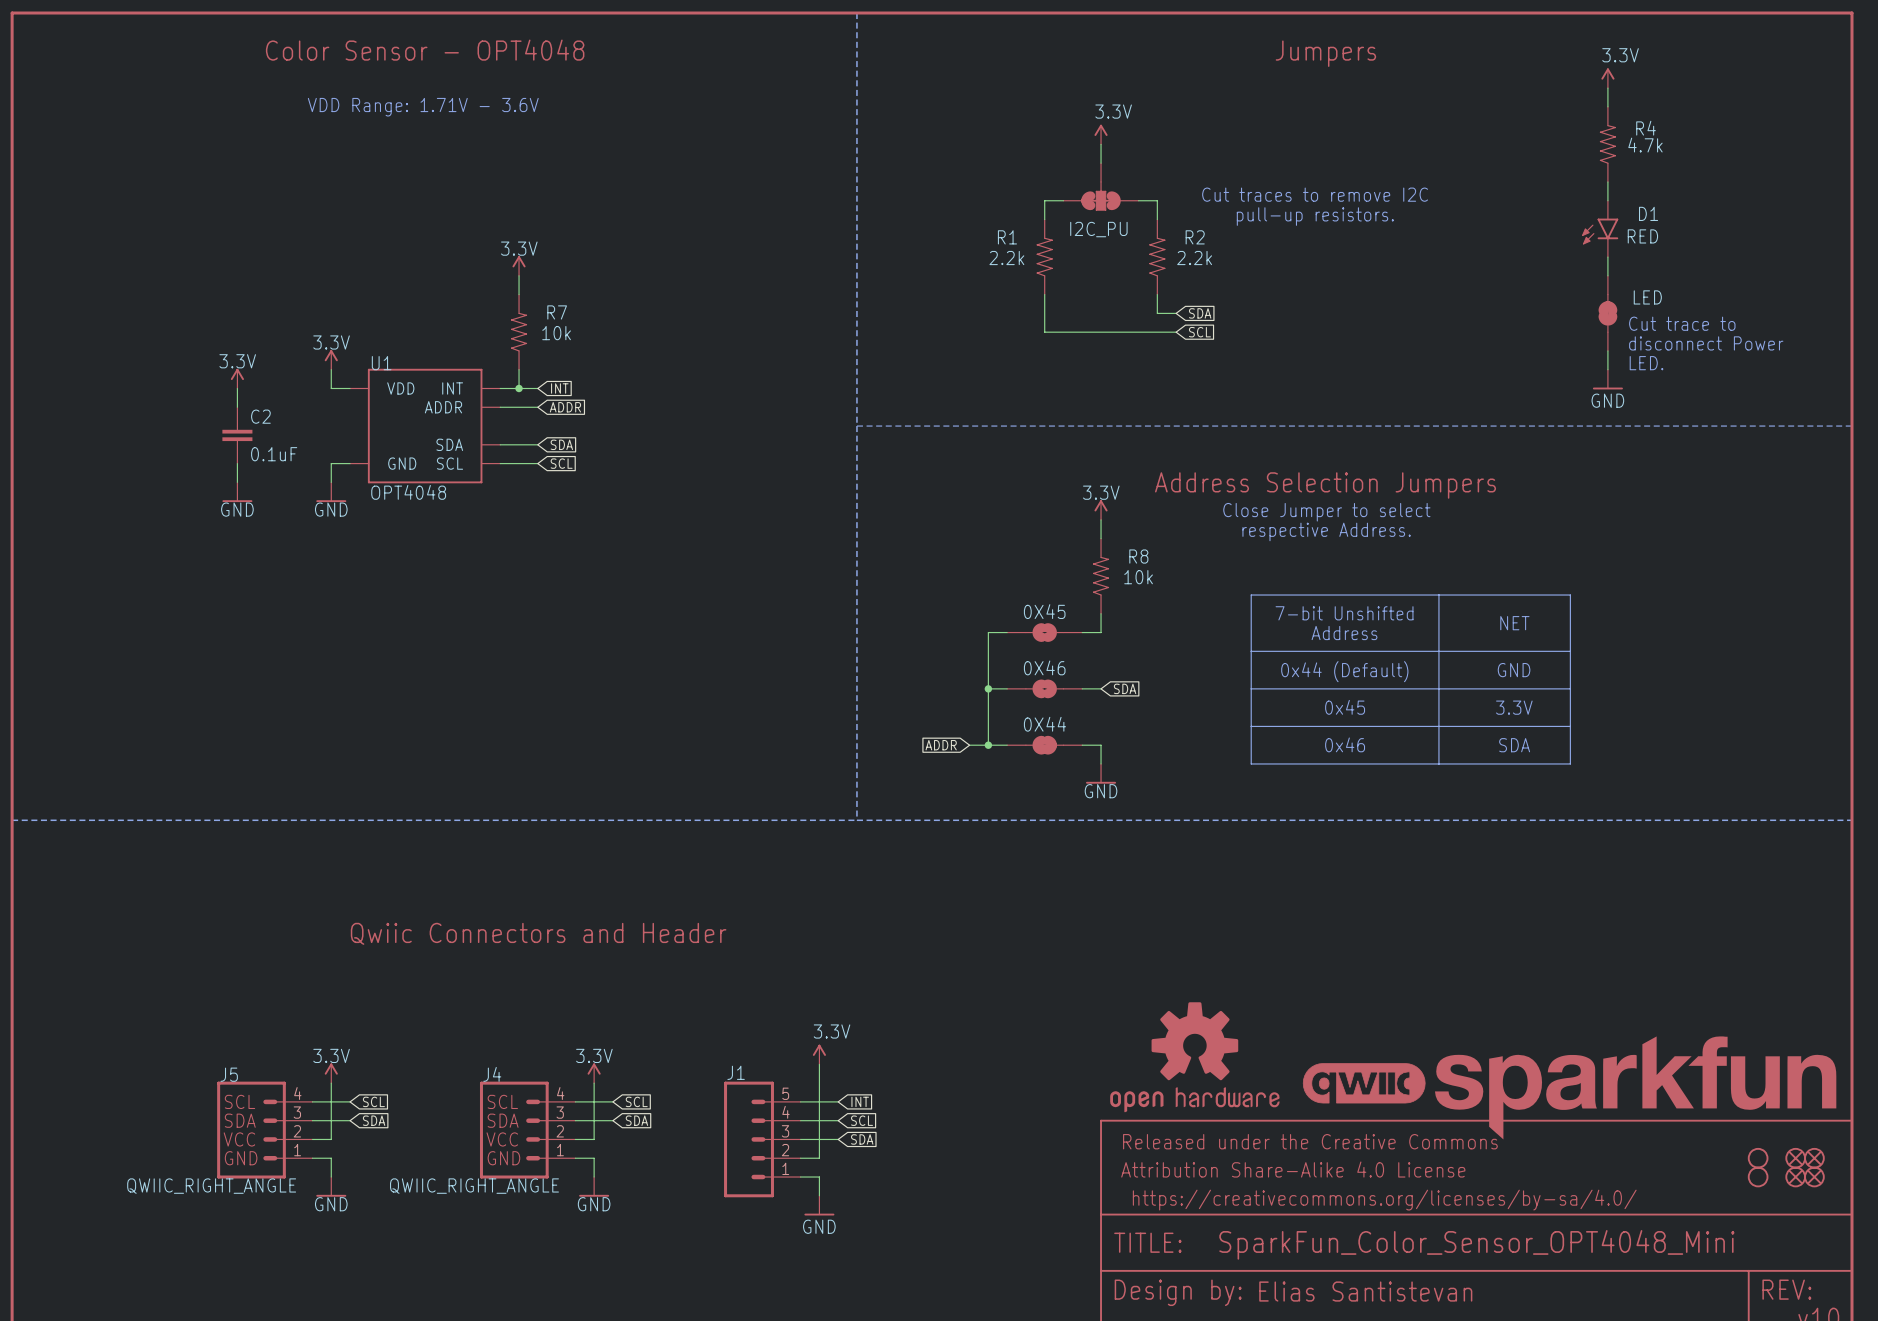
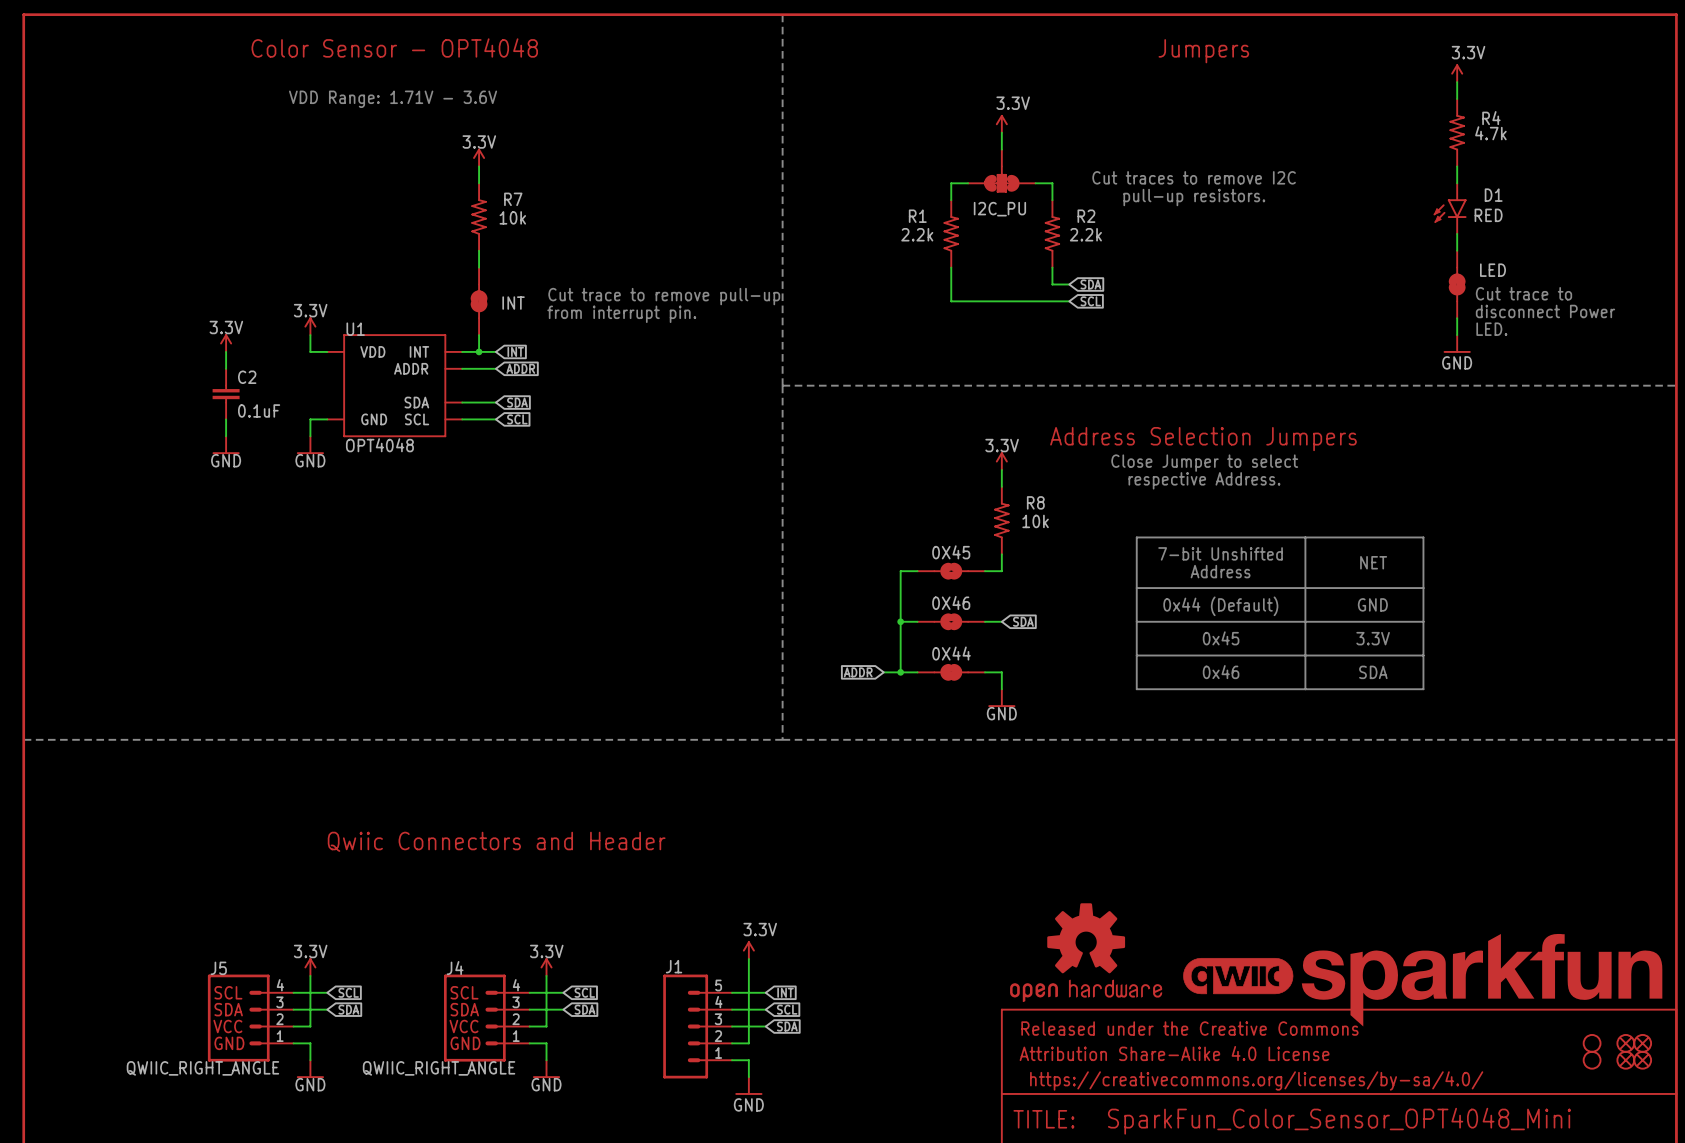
wire: none -> (479, 166) (479, 183)
power symbol position: 3.3V (519, 265) -> 3.3V (479, 157)
text: none -> Cut trace to remove pull-up (664, 296)
R7 position: (519, 332) -> (479, 217)
INT: none -> (479, 301)
text: none -> from interrupt pin. (621, 314)

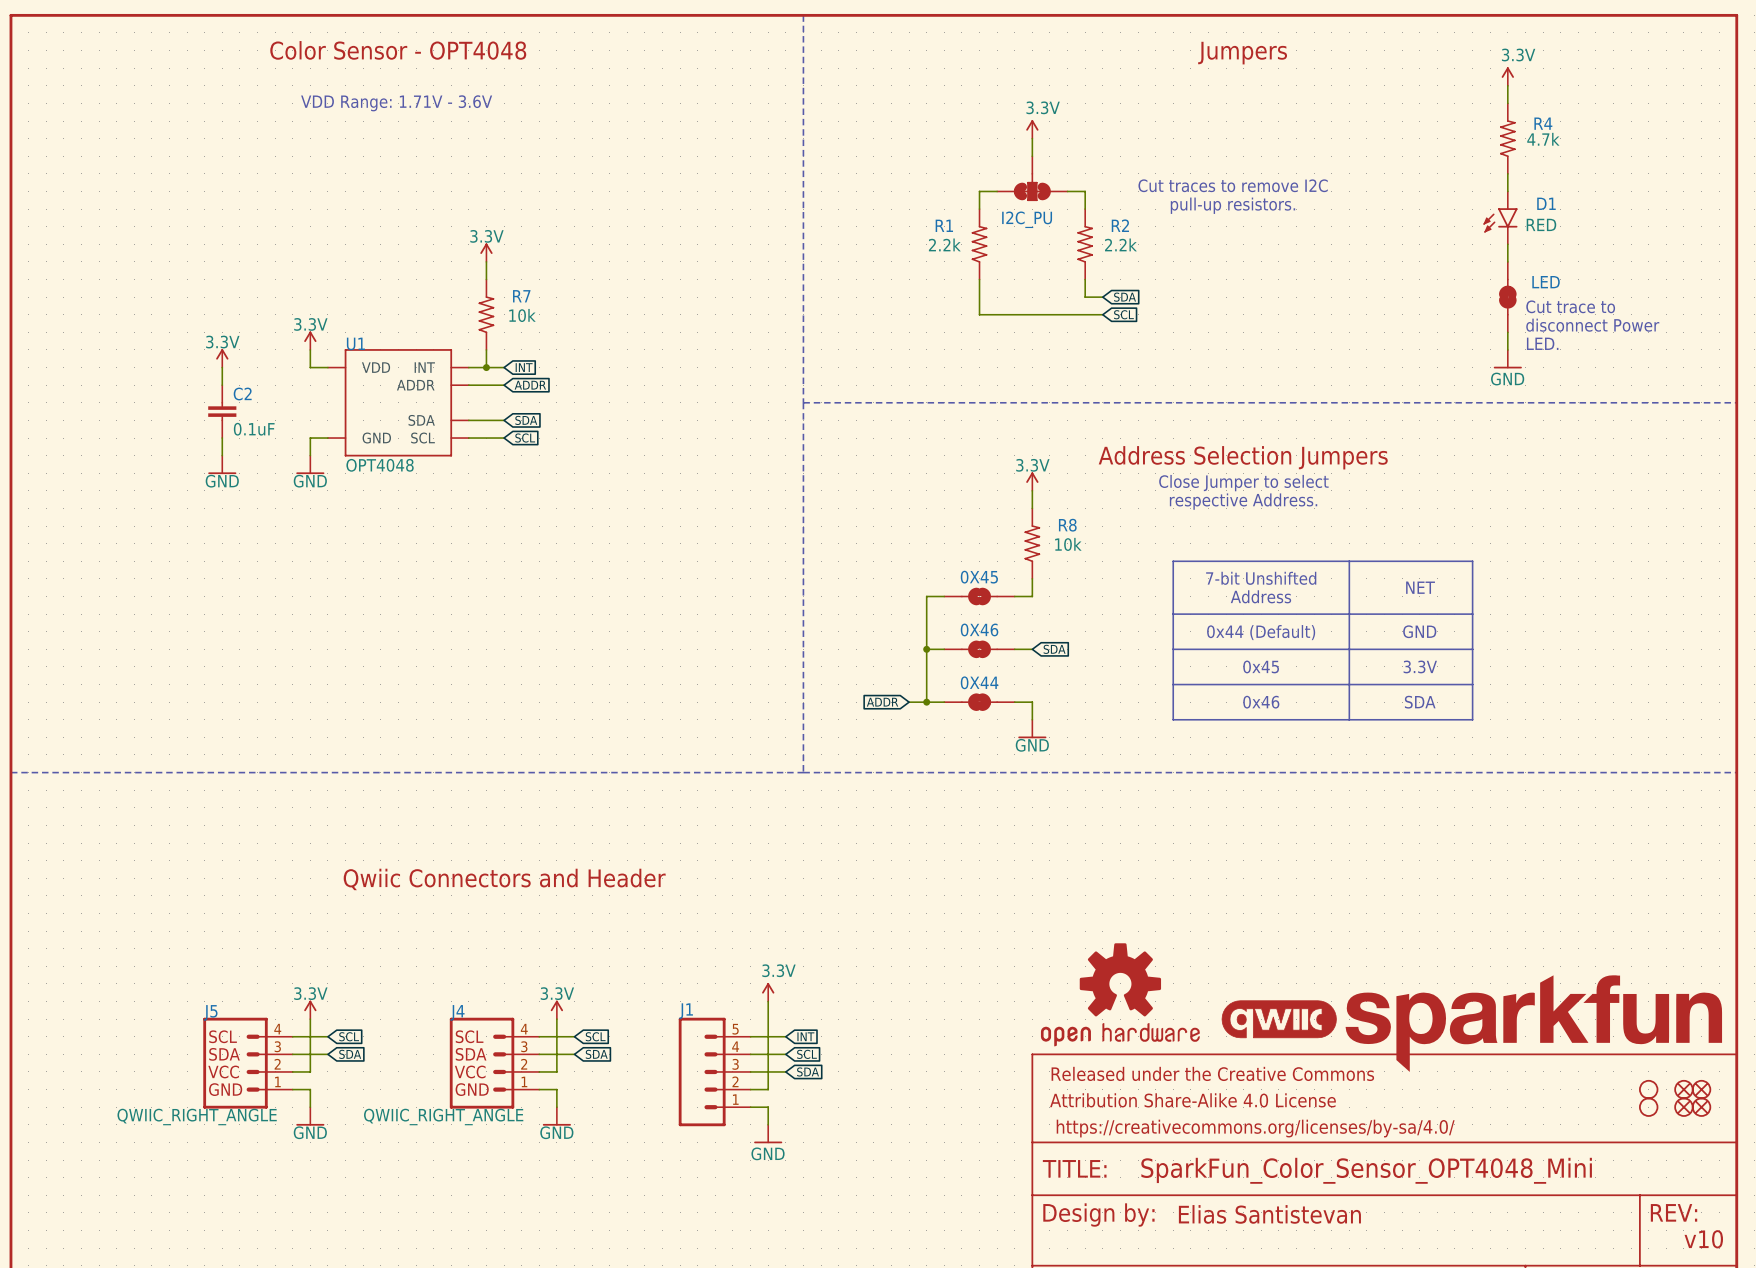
power symbol position: 3.3V (479, 157) -> 3.3V (486, 252)
wire: (479, 166) (479, 183) -> none
R7 position: (479, 217) -> (486, 314)
text: Cut trace to remove pull-up (664, 296) -> none
INT: (479, 301) -> none
text: from interrupt pin. (621, 314) -> none

